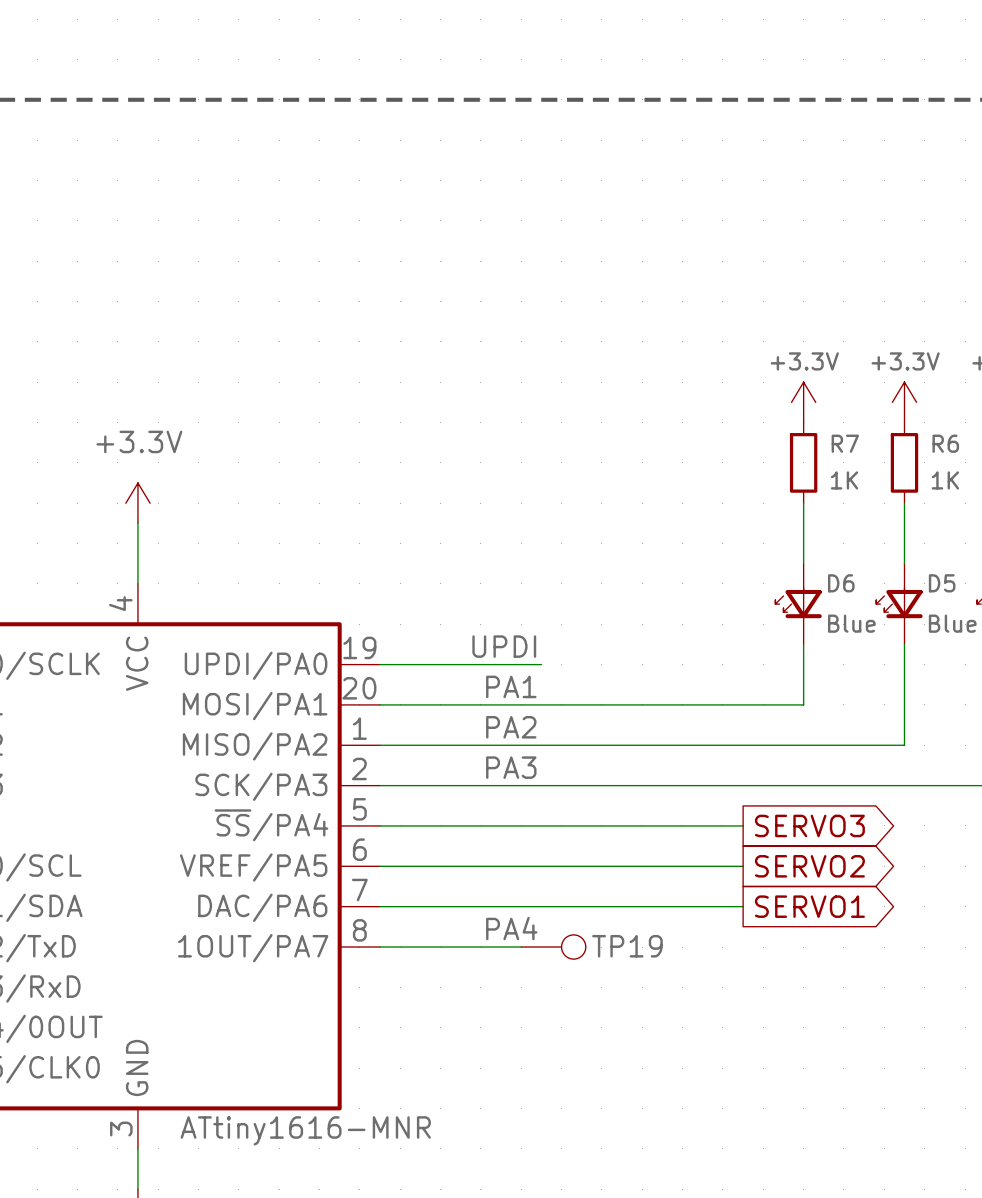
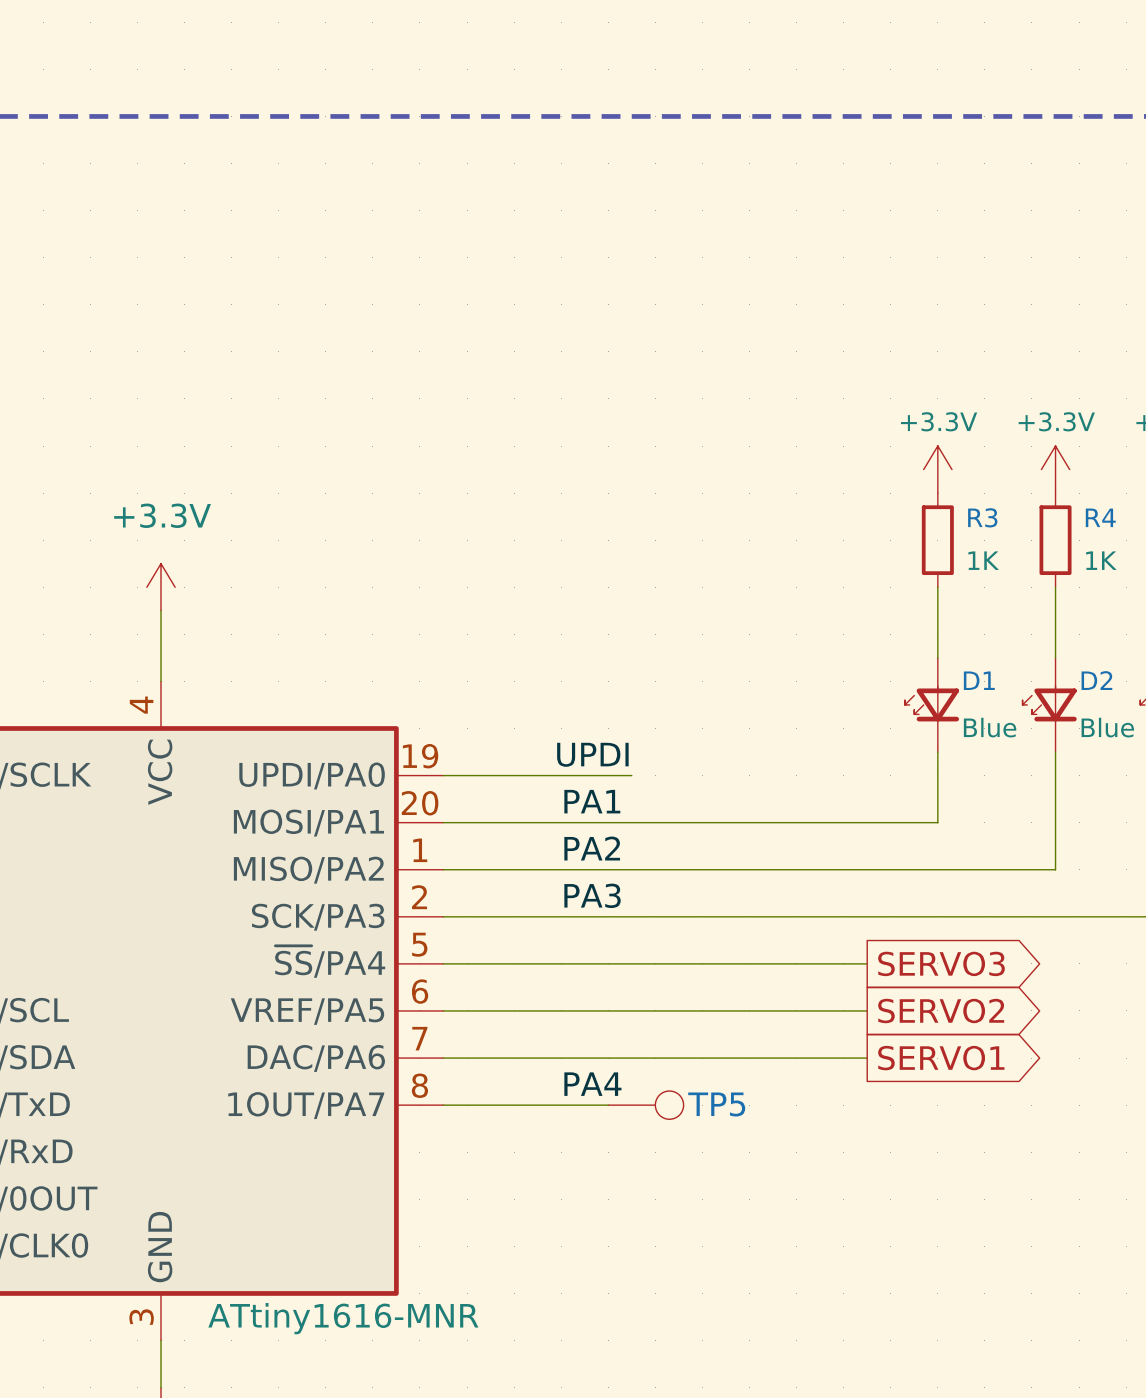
R7 name: R7 (845, 443) -> R3 (982, 517)
R6 name: R6 (945, 443) -> R4 (1100, 517)
D6 name: D6 (841, 583) -> D1 (979, 680)
D5 name: D5 (942, 583) -> D2 (1096, 680)
TP19 name: TP19 (627, 946) -> TP5 (716, 1104)

